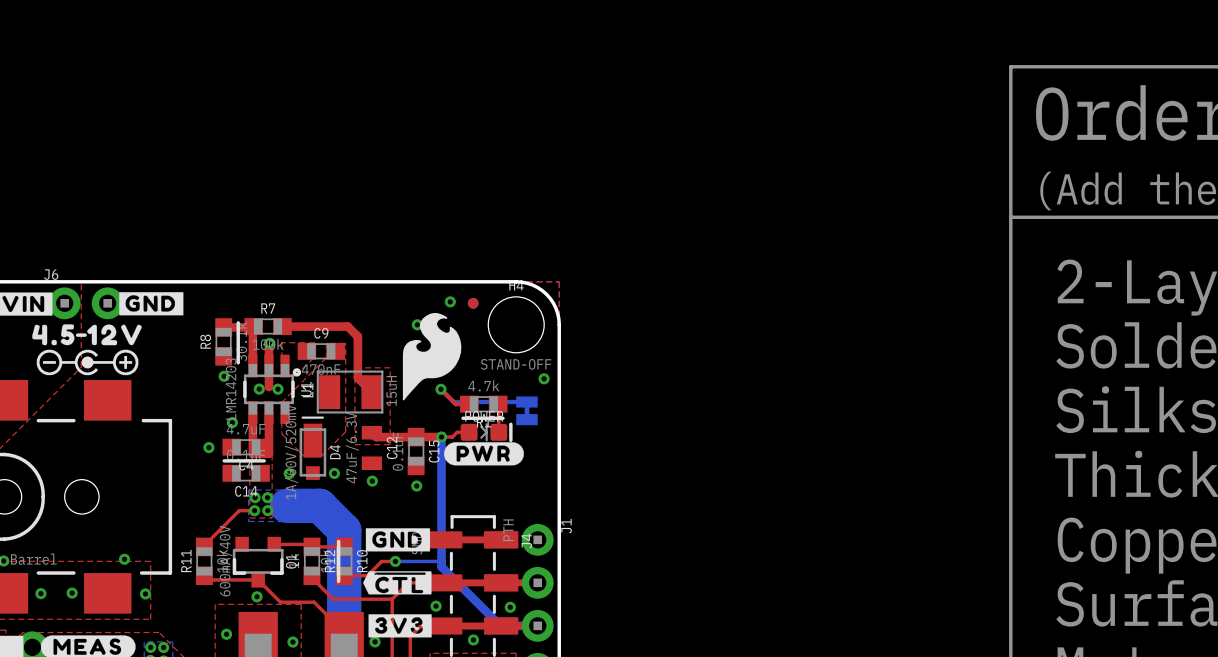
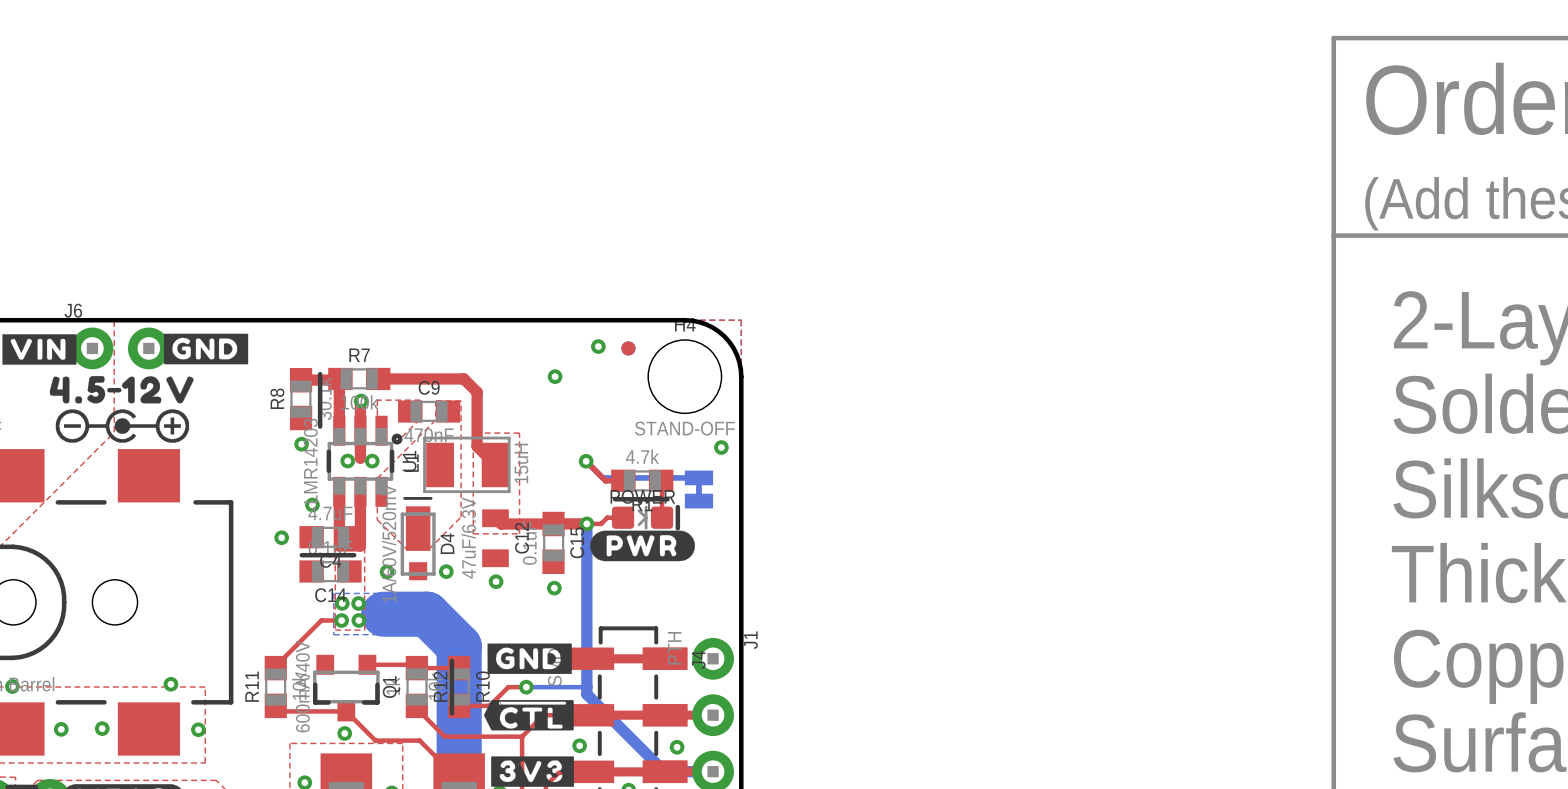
drawing: [402, 312, 462, 401] -> none

